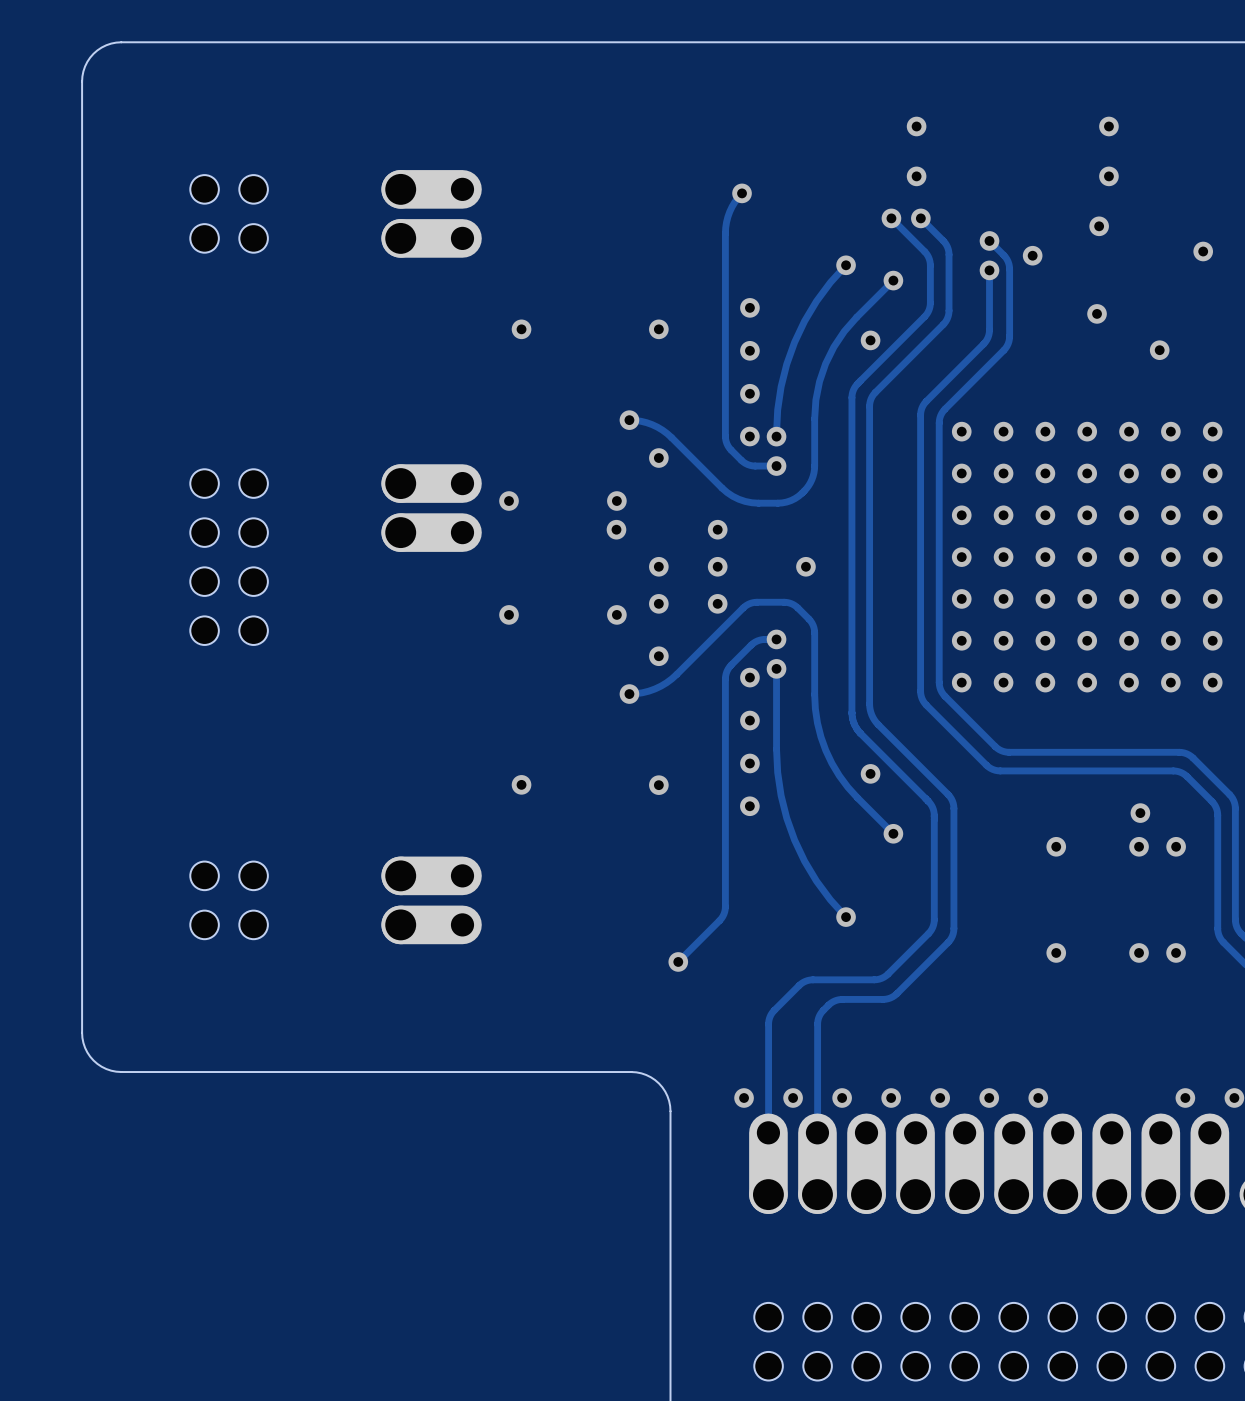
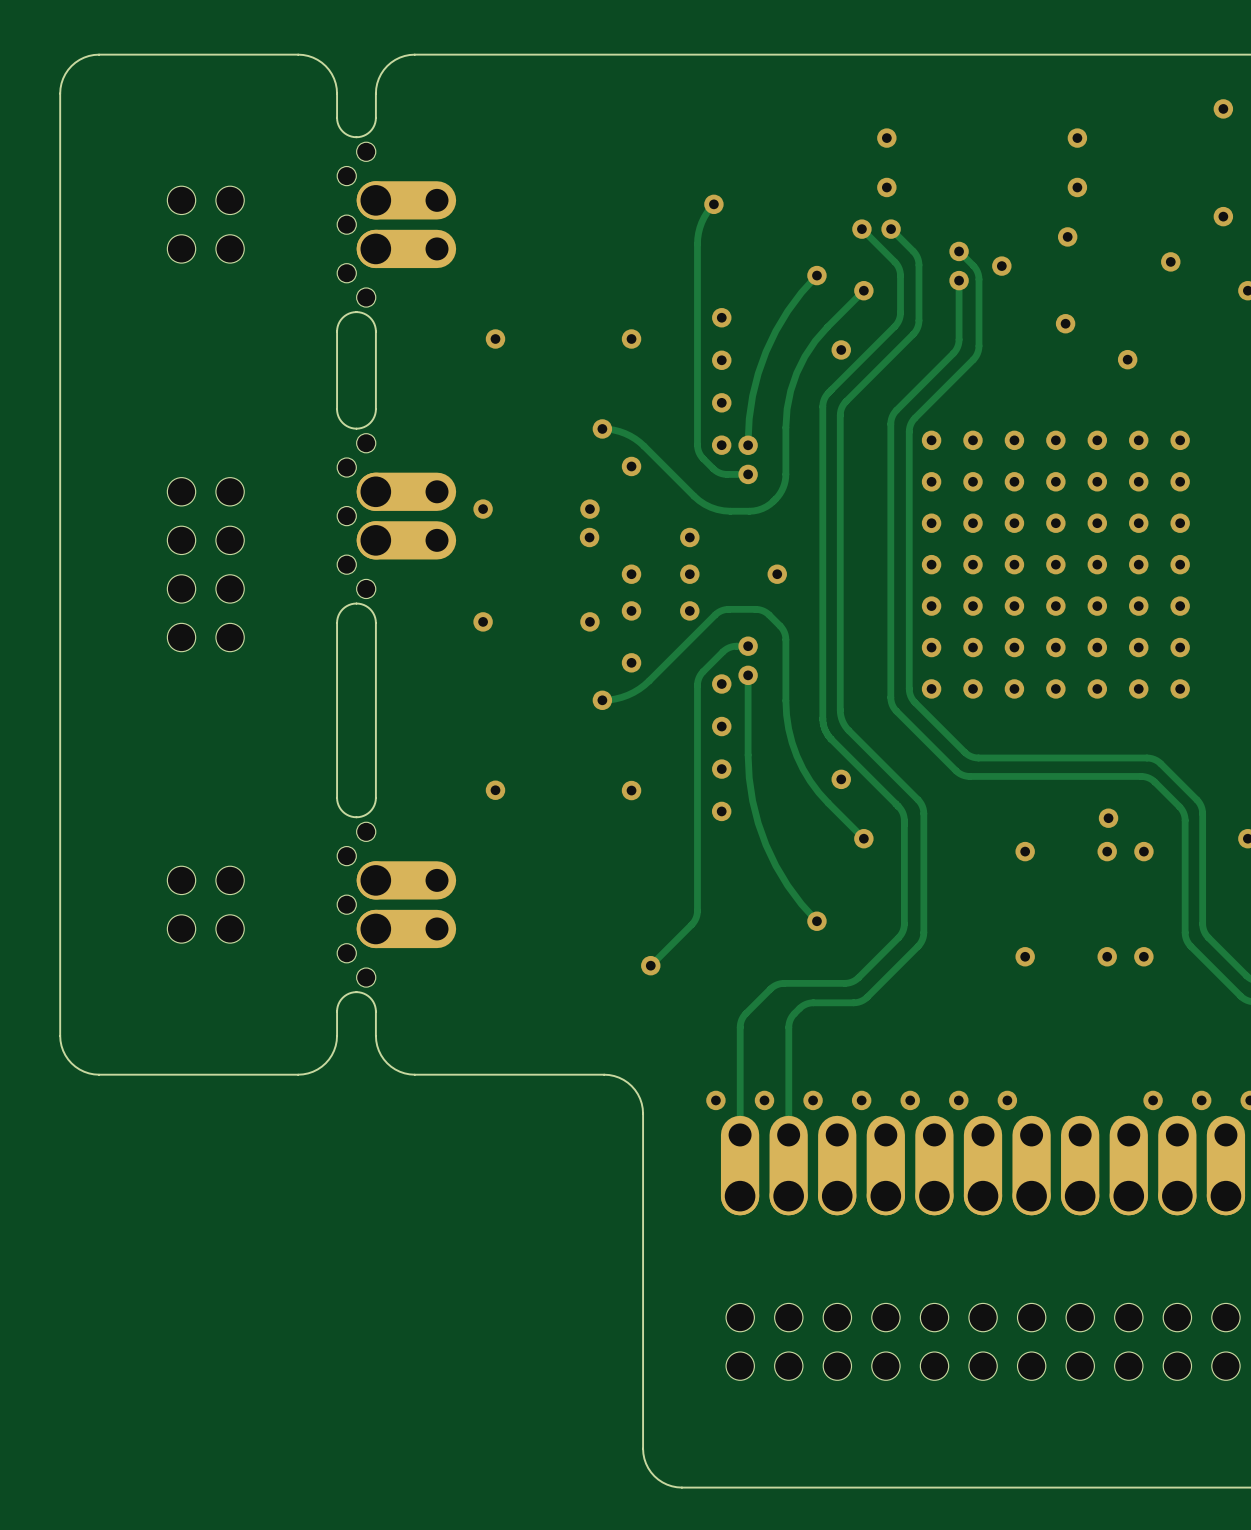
board edge: (440, 42) (322, 42) -> (414, 54) (395, 59) (383, 69) (376, 88) (374, 125) (368, 133) (356, 137) (346, 134) (338, 125) (336, 88) (329, 69) (313, 57) (298, 54)
part: none -> (356, 224)
board edge: none -> (356, 312) (370, 317) (375, 331) (375, 414) (368, 424) (356, 428) (342, 422) (337, 409) (337, 326) (344, 316) (356, 312)
part: none -> (356, 516)
board edge: none -> (356, 603) (342, 609) (337, 622) (337, 800) (342, 811) (356, 817) (370, 811) (375, 797) (375, 620) (368, 607) (356, 603)
part: none -> (356, 904)
board edge: (440, 1072) (322, 1072) -> (414, 1074) (399, 1071) (383, 1059) (376, 1040) (374, 1004) (366, 994) (356, 992) (344, 996) (338, 1004) (336, 1040) (329, 1059) (317, 1069) (298, 1074)

